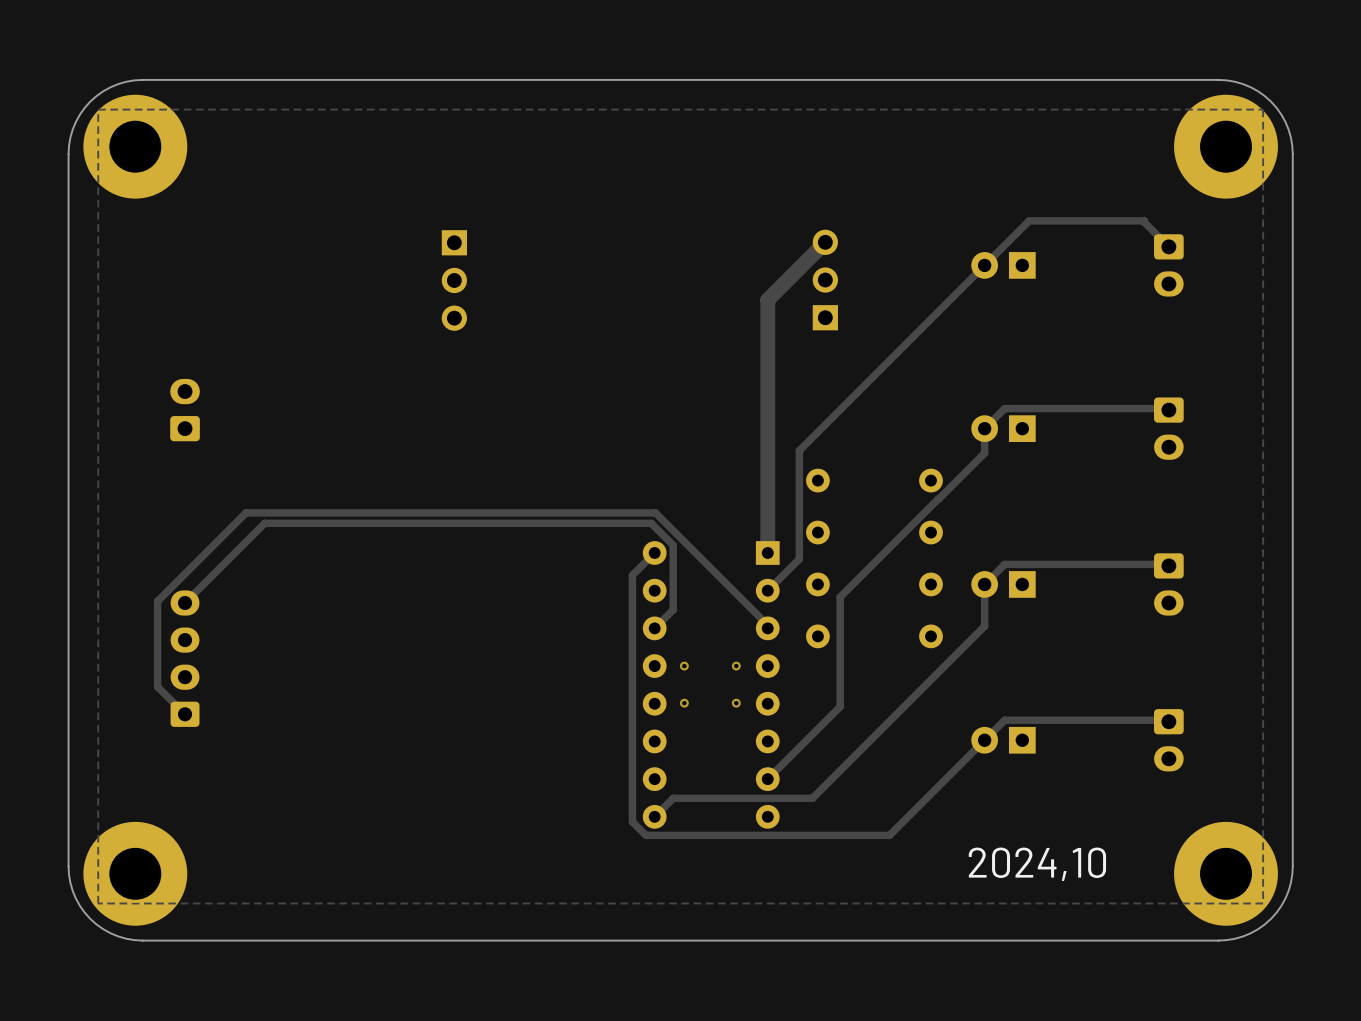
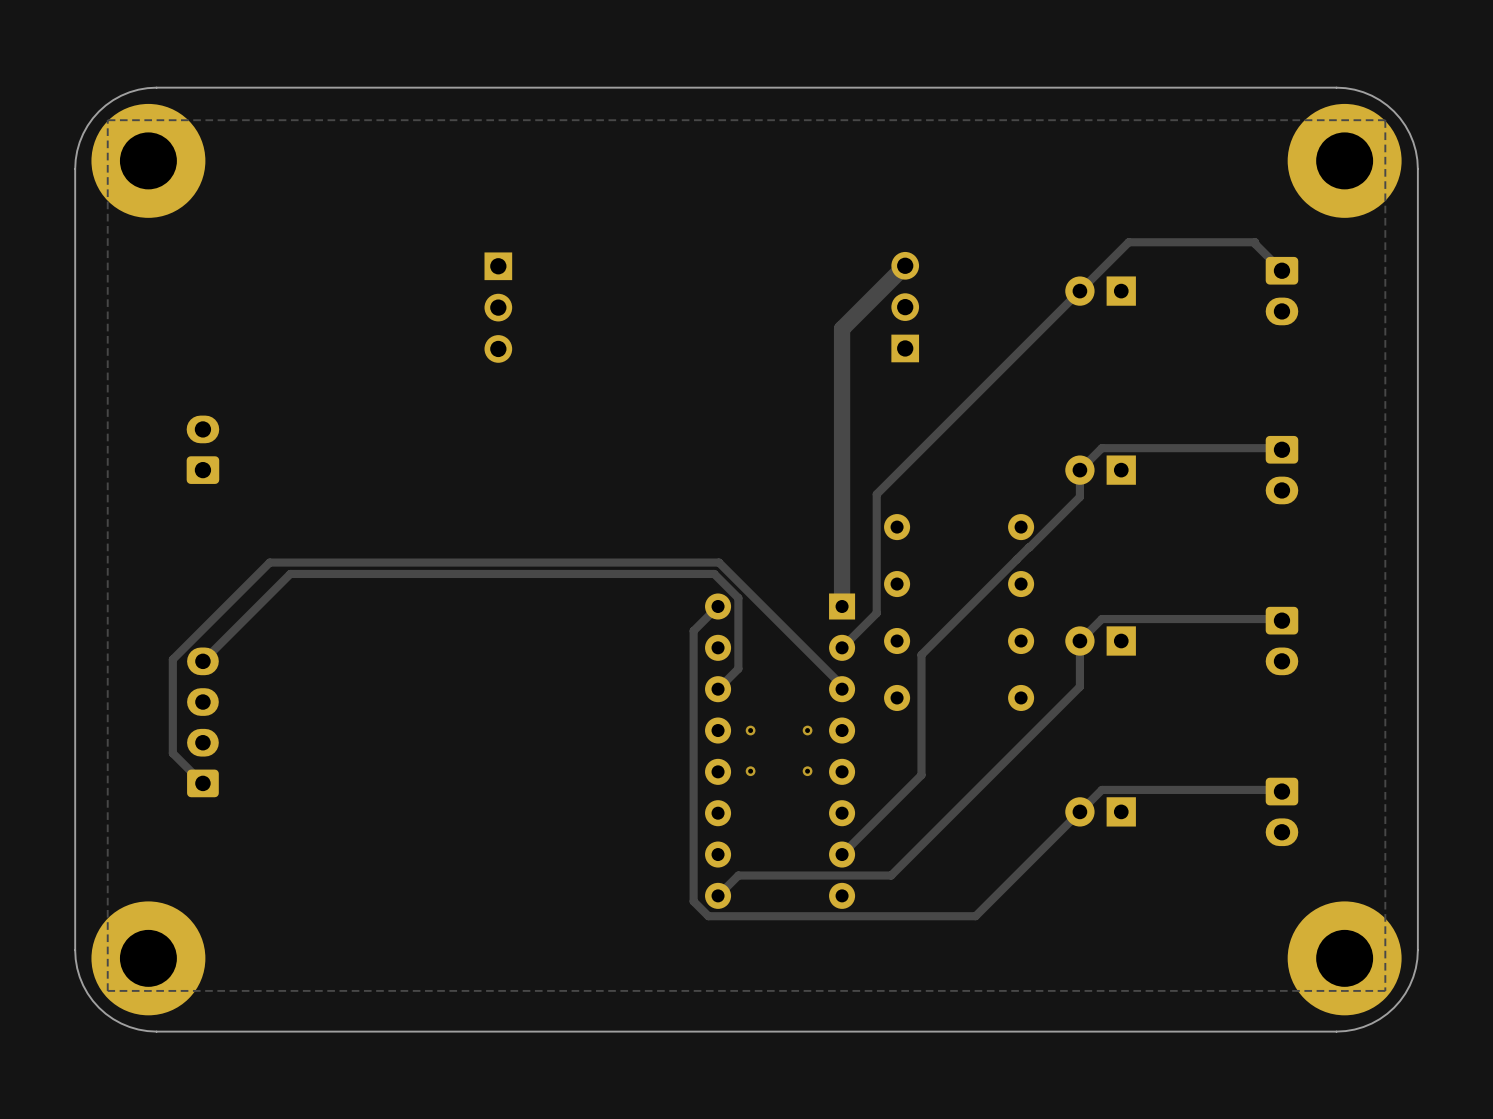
text: 2024,10 (1037, 864) -> none

